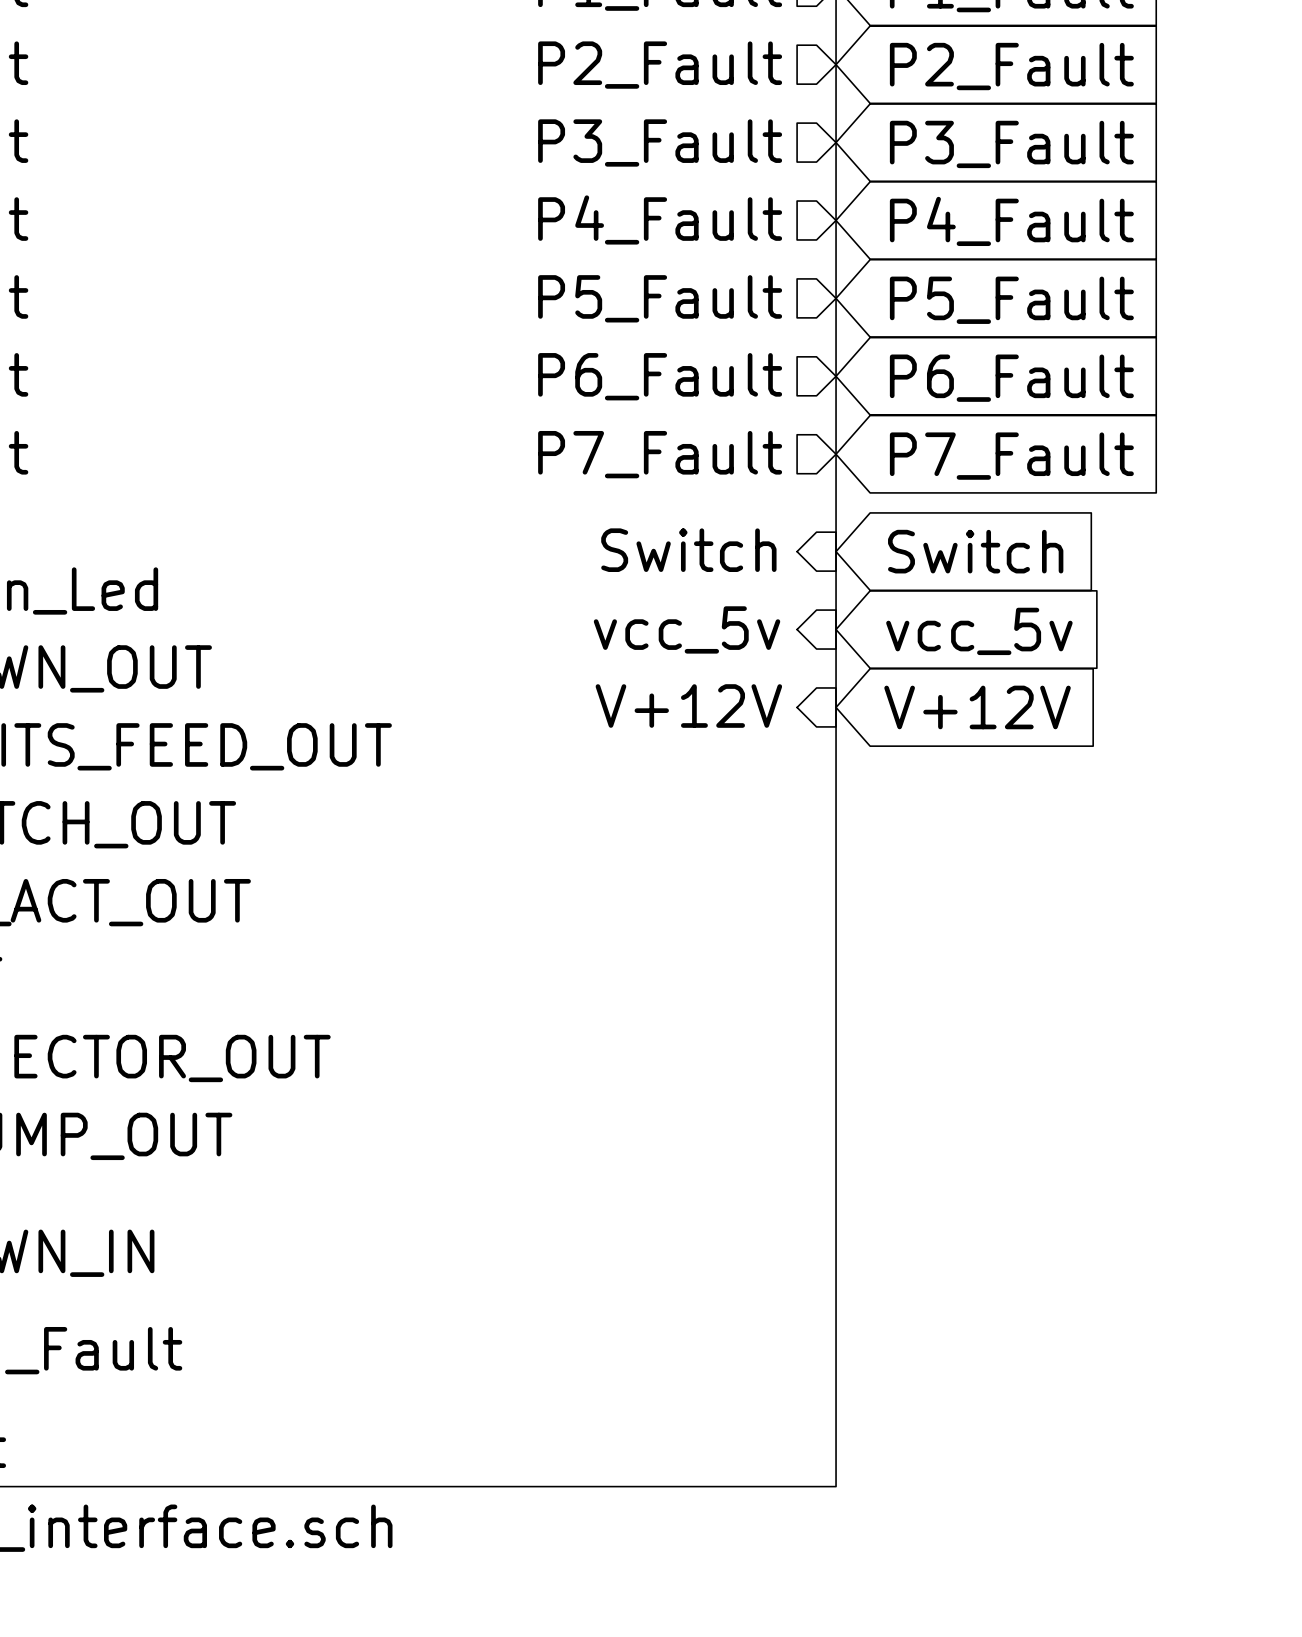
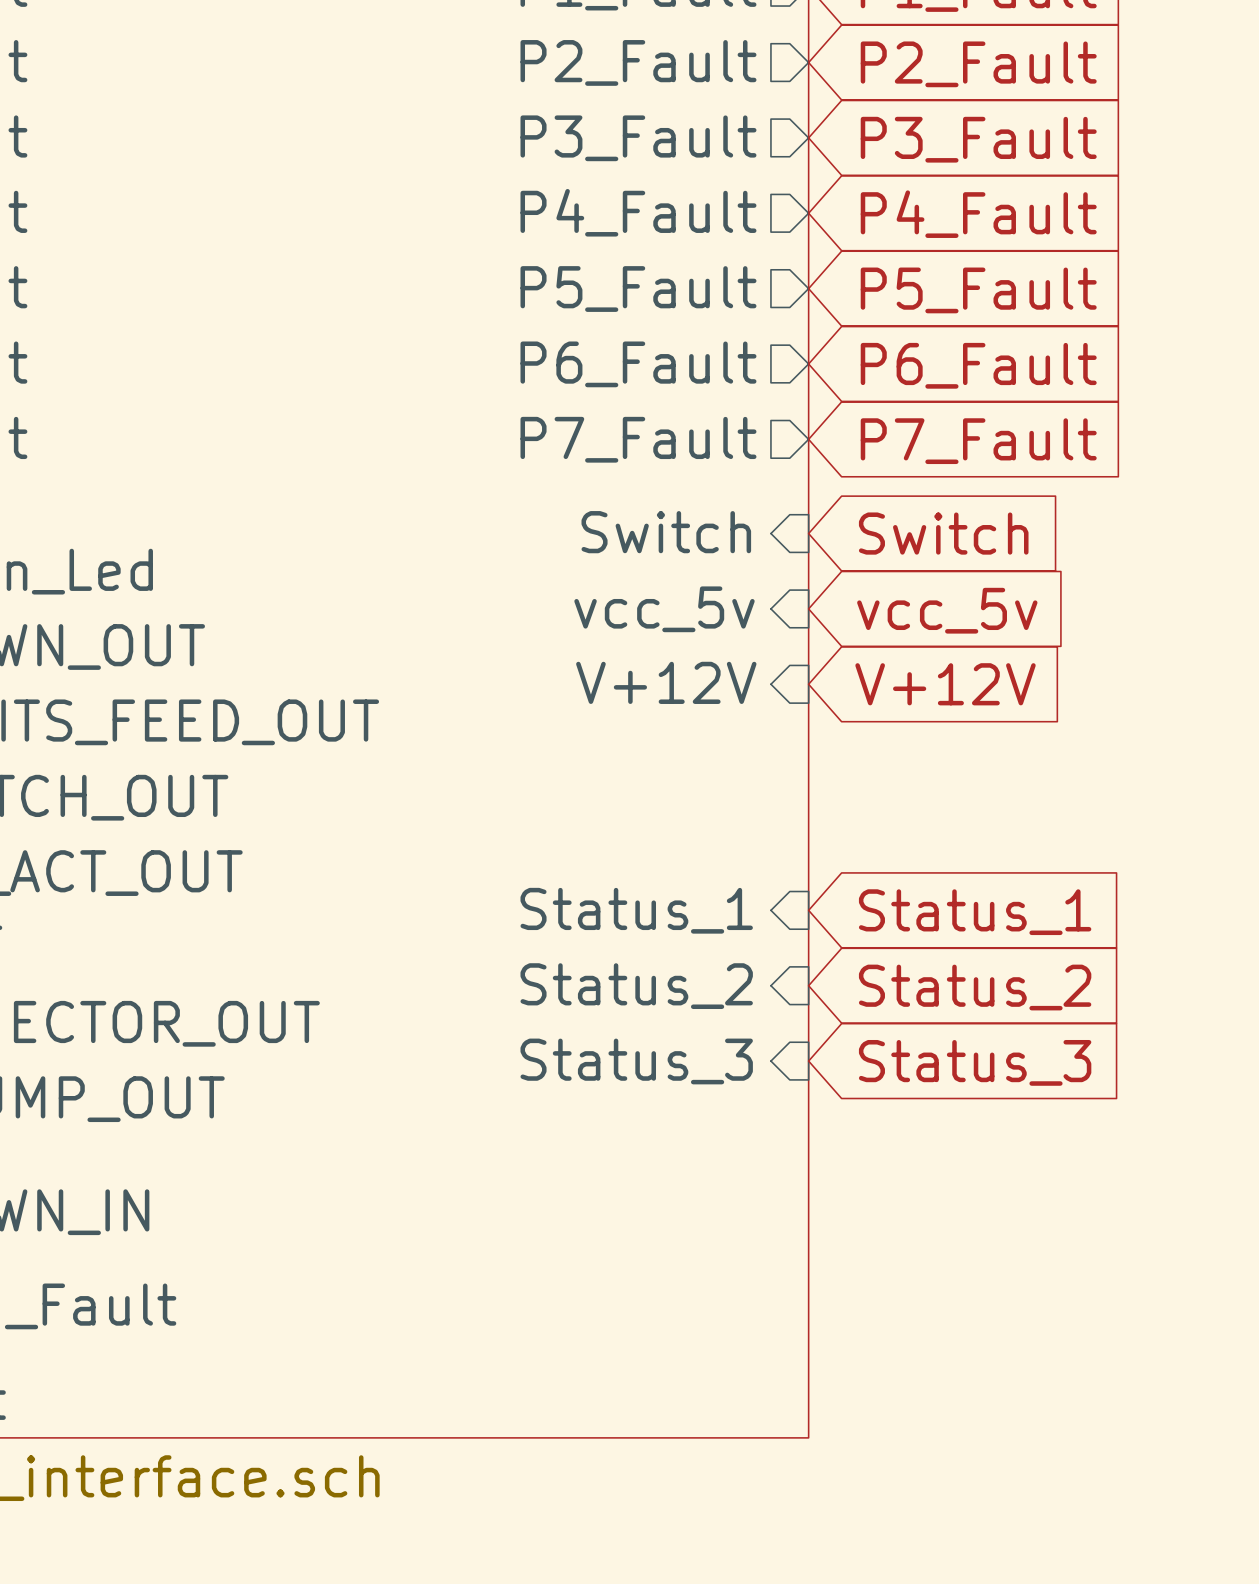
sheet pin: none -> Status_1 (636, 910)
global label: none -> Status_1 (975, 912)
sheet pin: none -> Status_2 (636, 986)
global label: none -> Status_2 (975, 987)
sheet pin: none -> Status_3 (636, 1061)
global label: none -> Status_3 (975, 1062)

